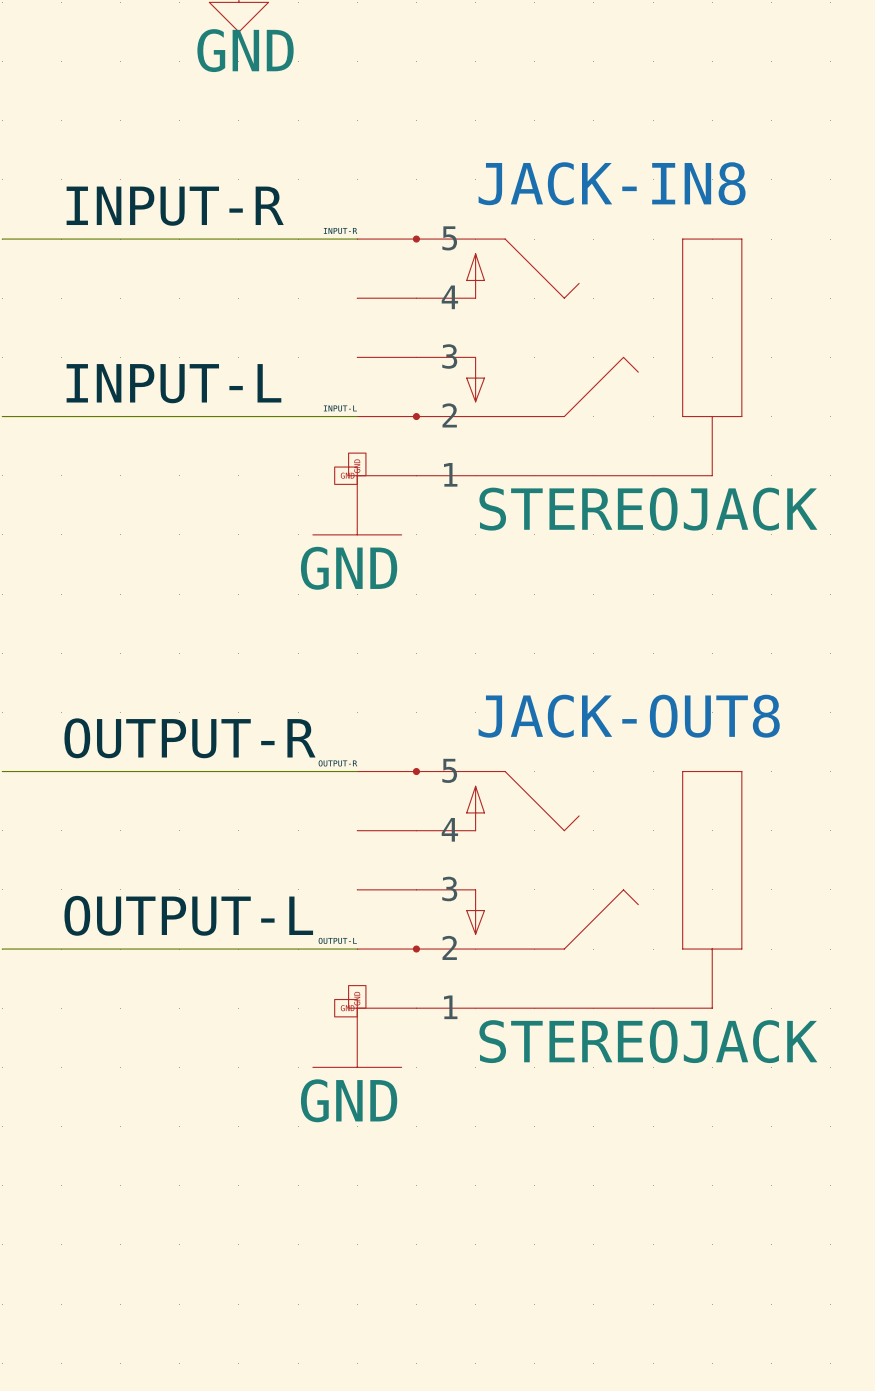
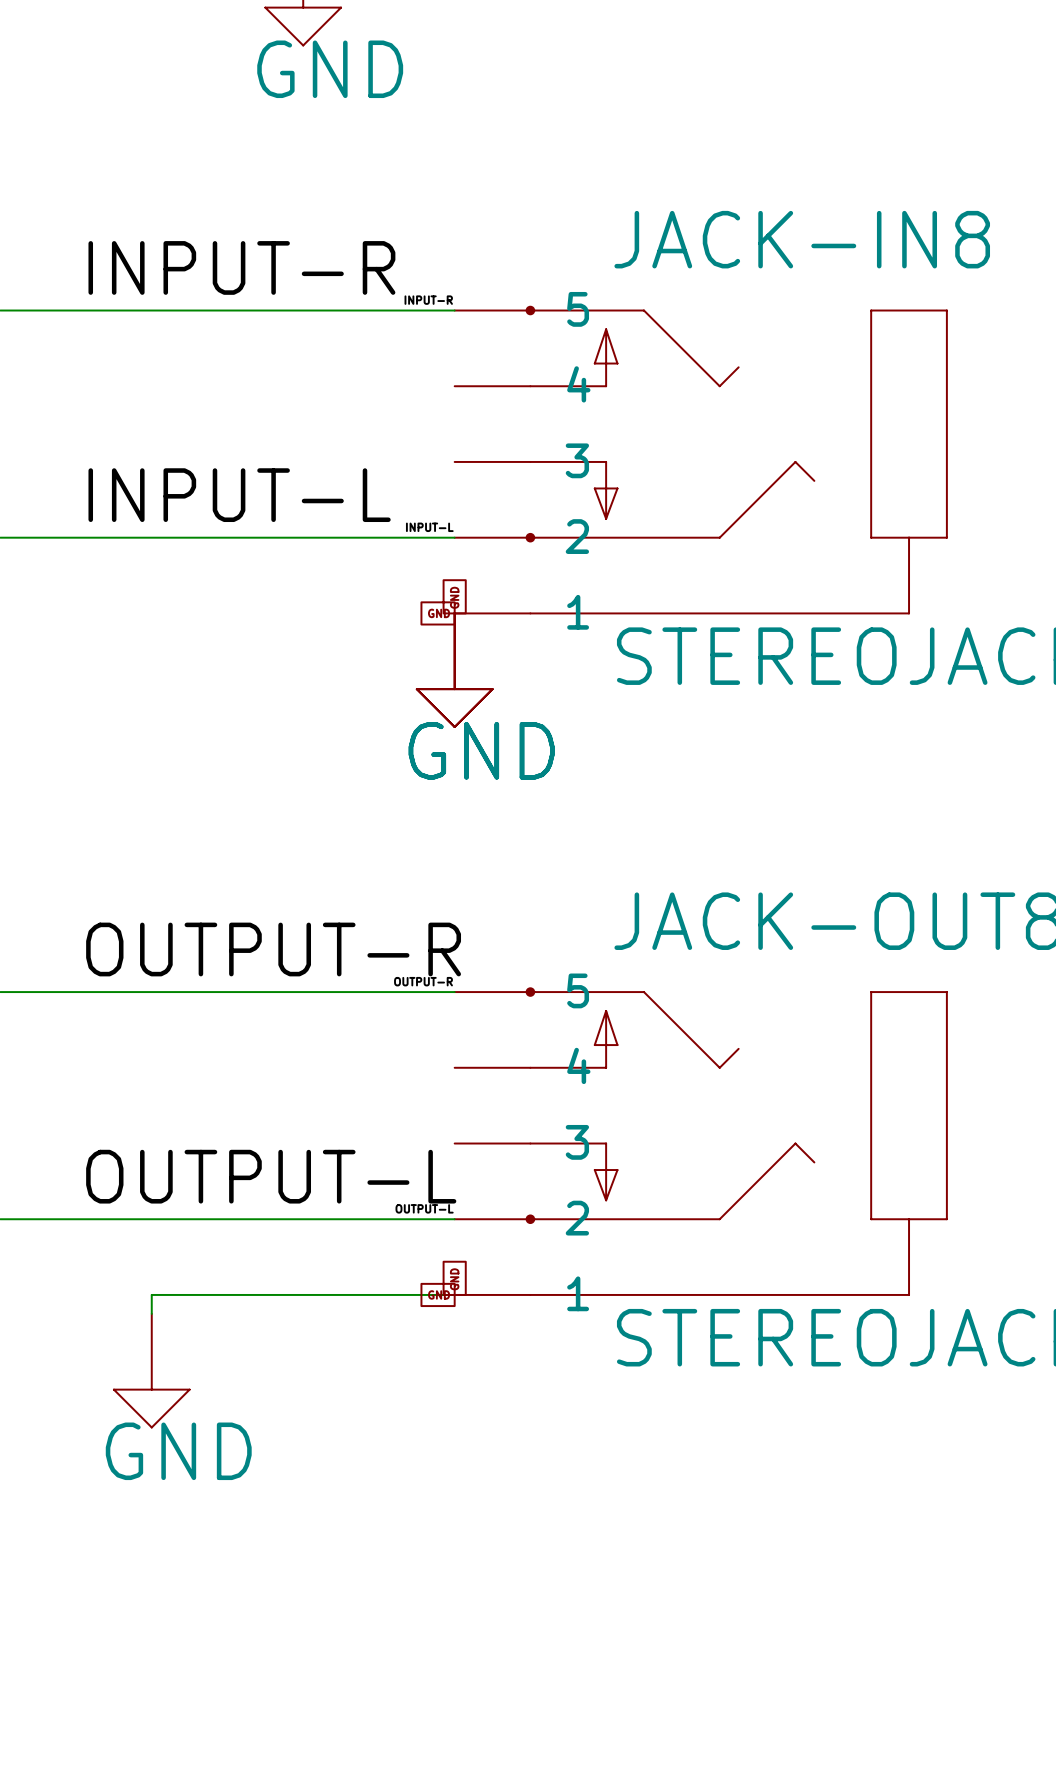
power symbol shape: [312, 475, 402, 535] -> [416, 613, 493, 728]
wire: none -> (454, 1294) (151, 1294) (151, 1313)
power symbol: GND (357, 1037) -> none
power symbol: none -> GND (151, 1370)

